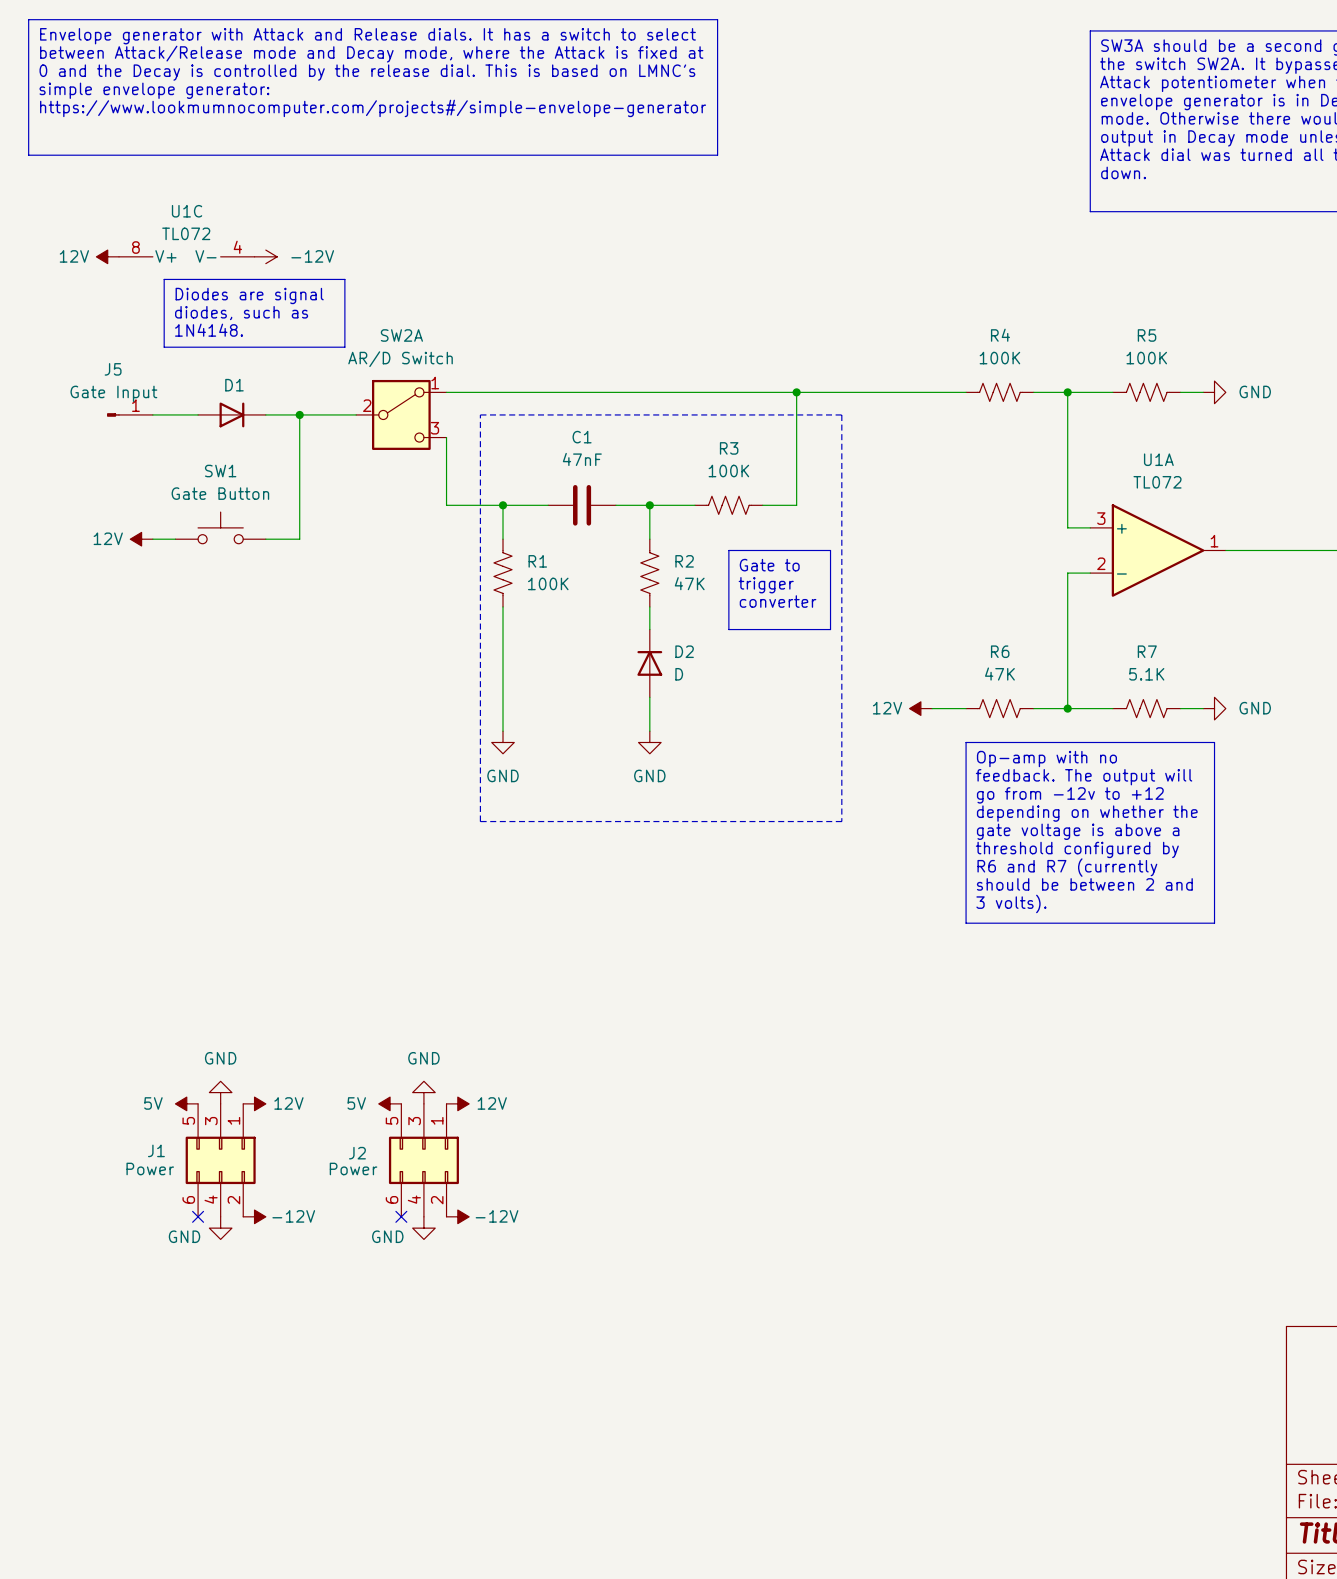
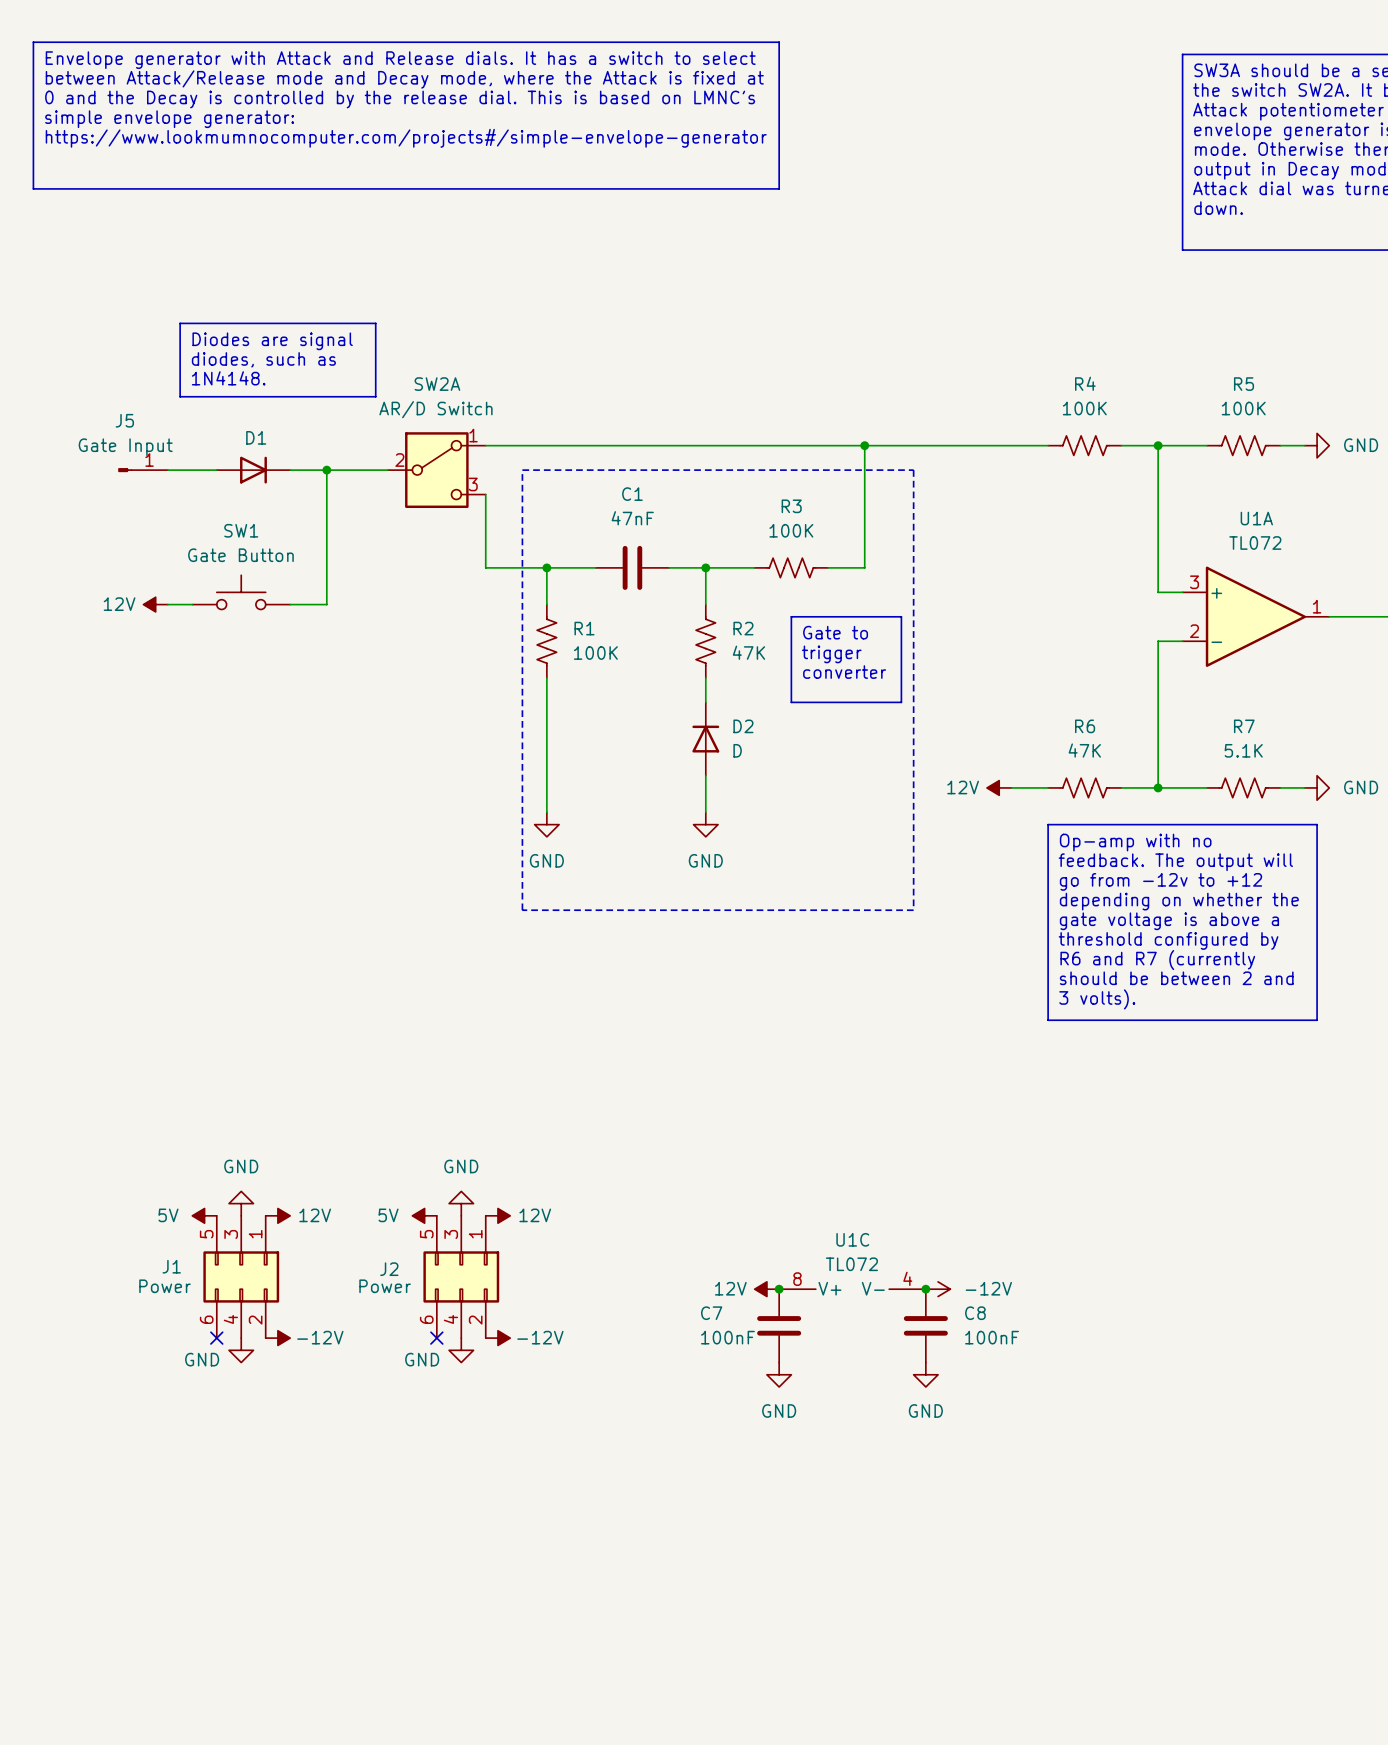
power symbol: 12V (107, 256) -> none
U1C position: (186, 256) -> (852, 1289)
power symbol: -12V (265, 256) -> none
power symbol: none -> 12V (766, 1289)
junction: none -> (779, 1289)
junction: none -> (925, 1289)
power symbol: none -> -12V (938, 1289)
C7: none -> 100nF (779, 1325)
C8: none -> 100nF (925, 1325)
power symbol: none -> GND (779, 1374)
power symbol: none -> GND (925, 1374)

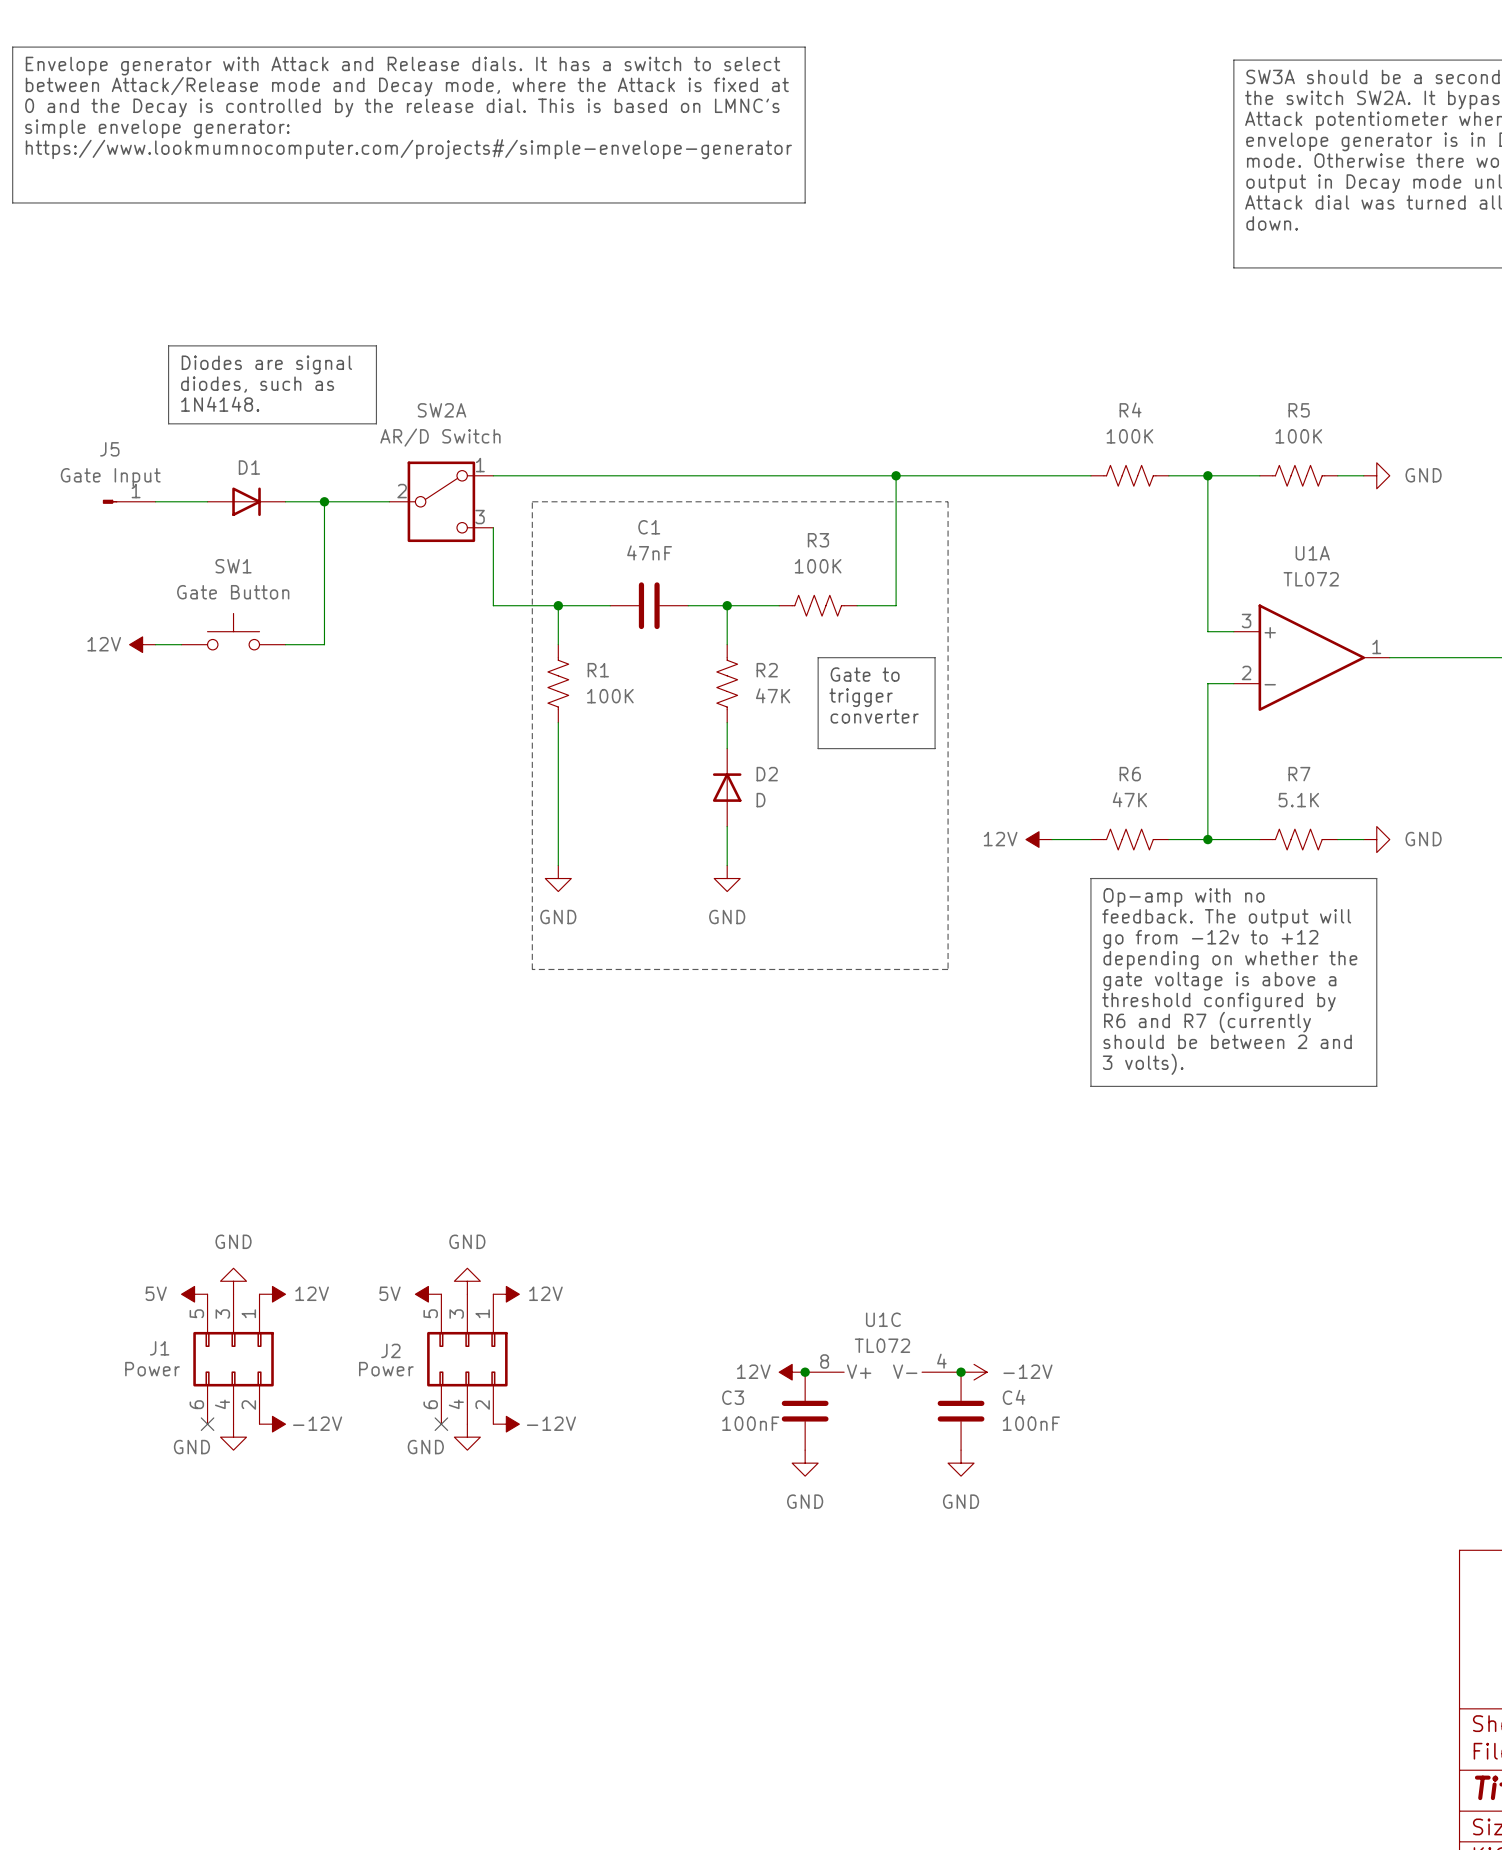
C7 name: C7 (711, 1313) -> C3 (733, 1397)
C8 name: C8 (975, 1313) -> C4 (1014, 1397)

